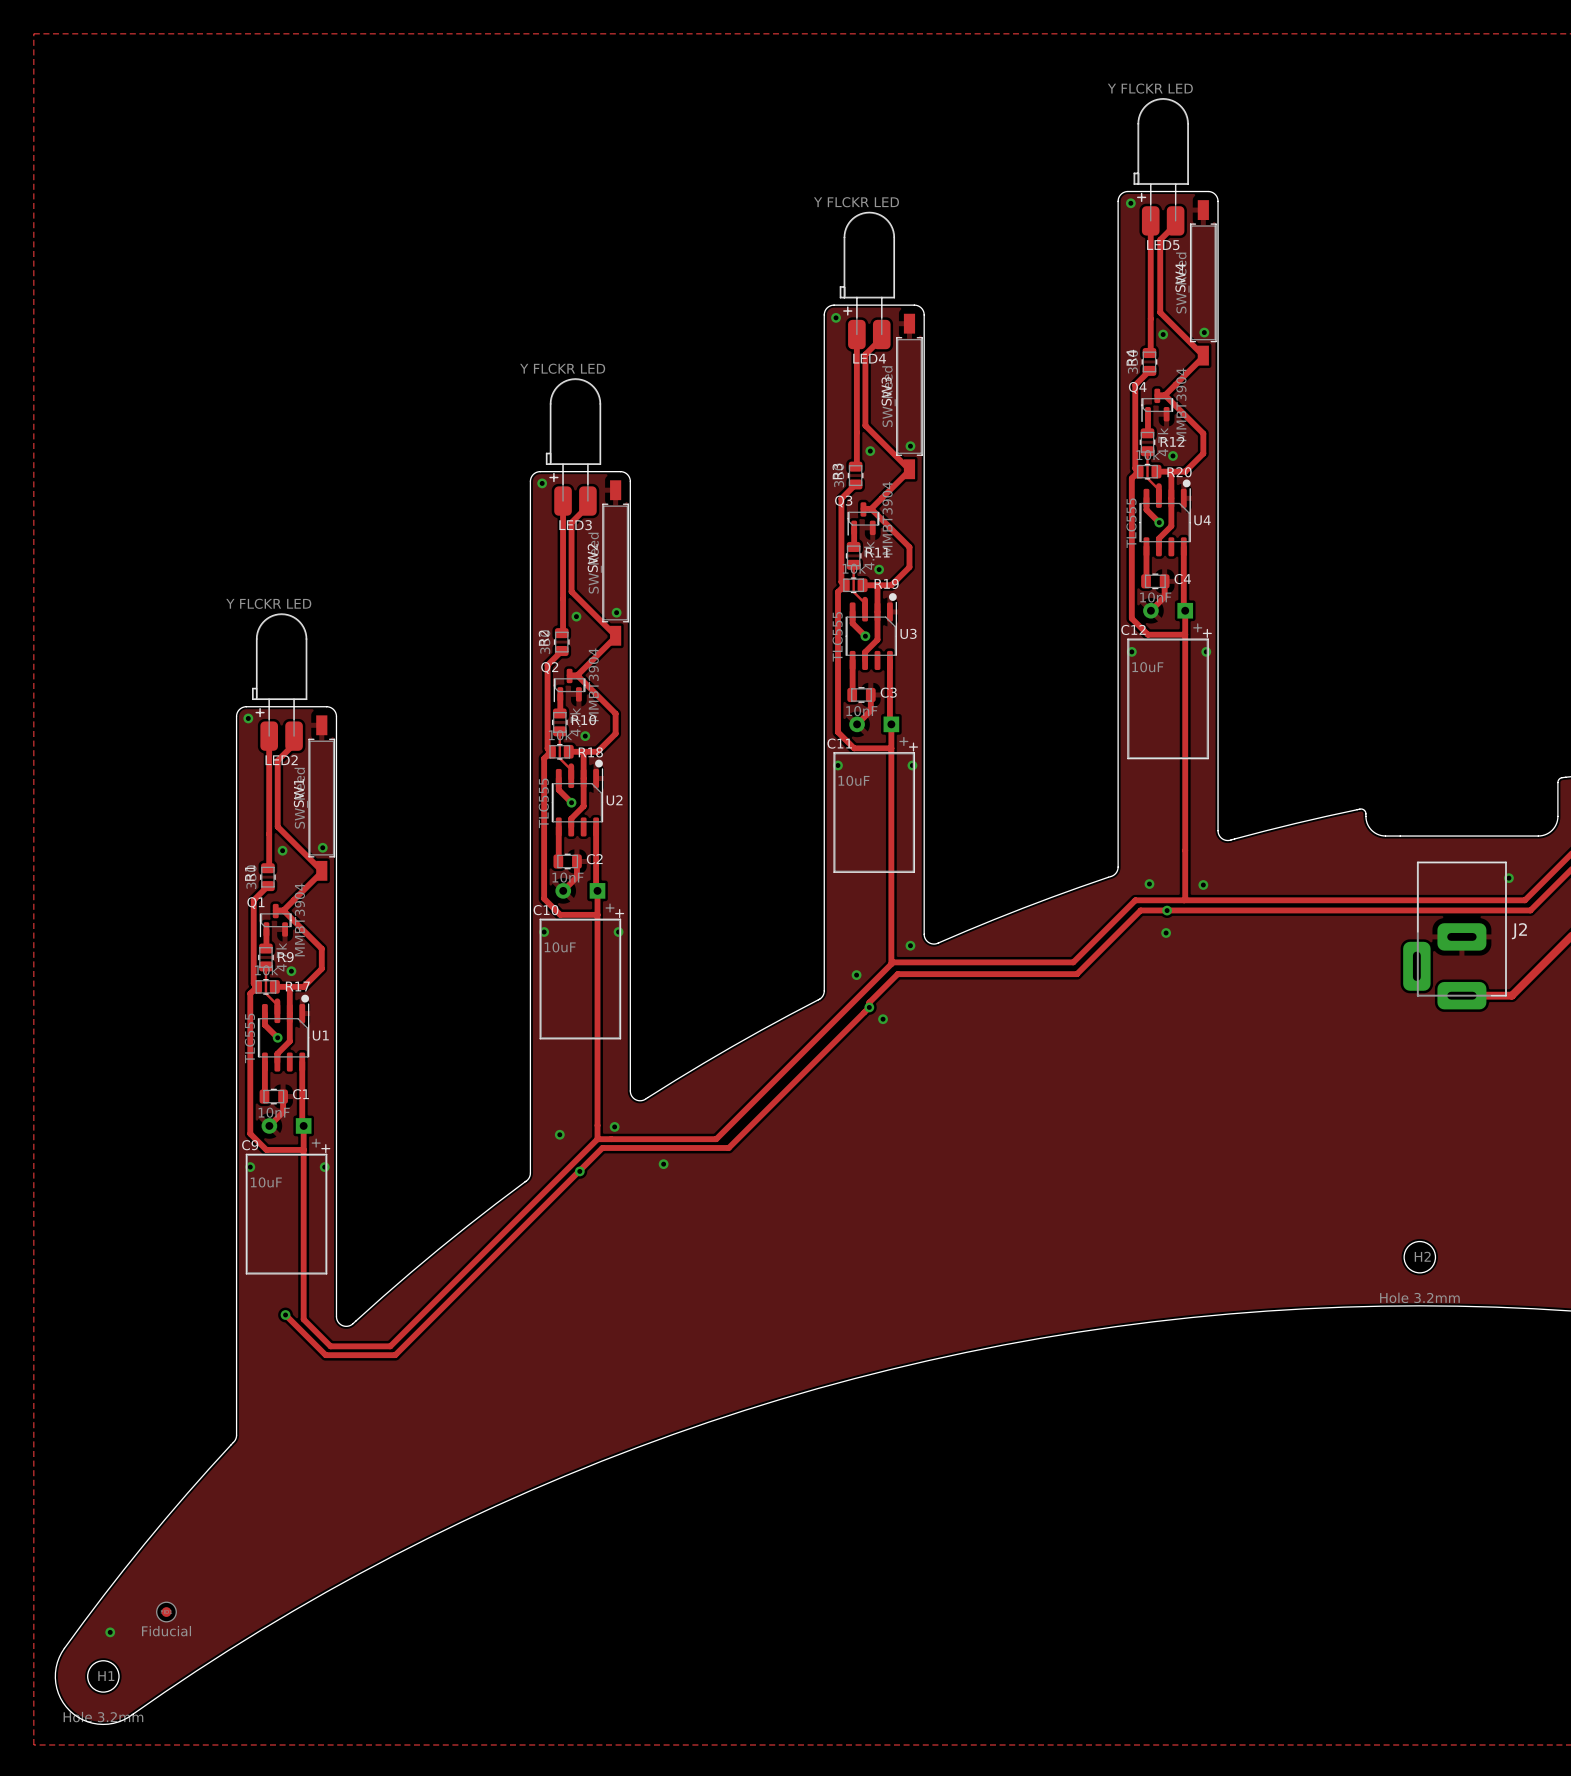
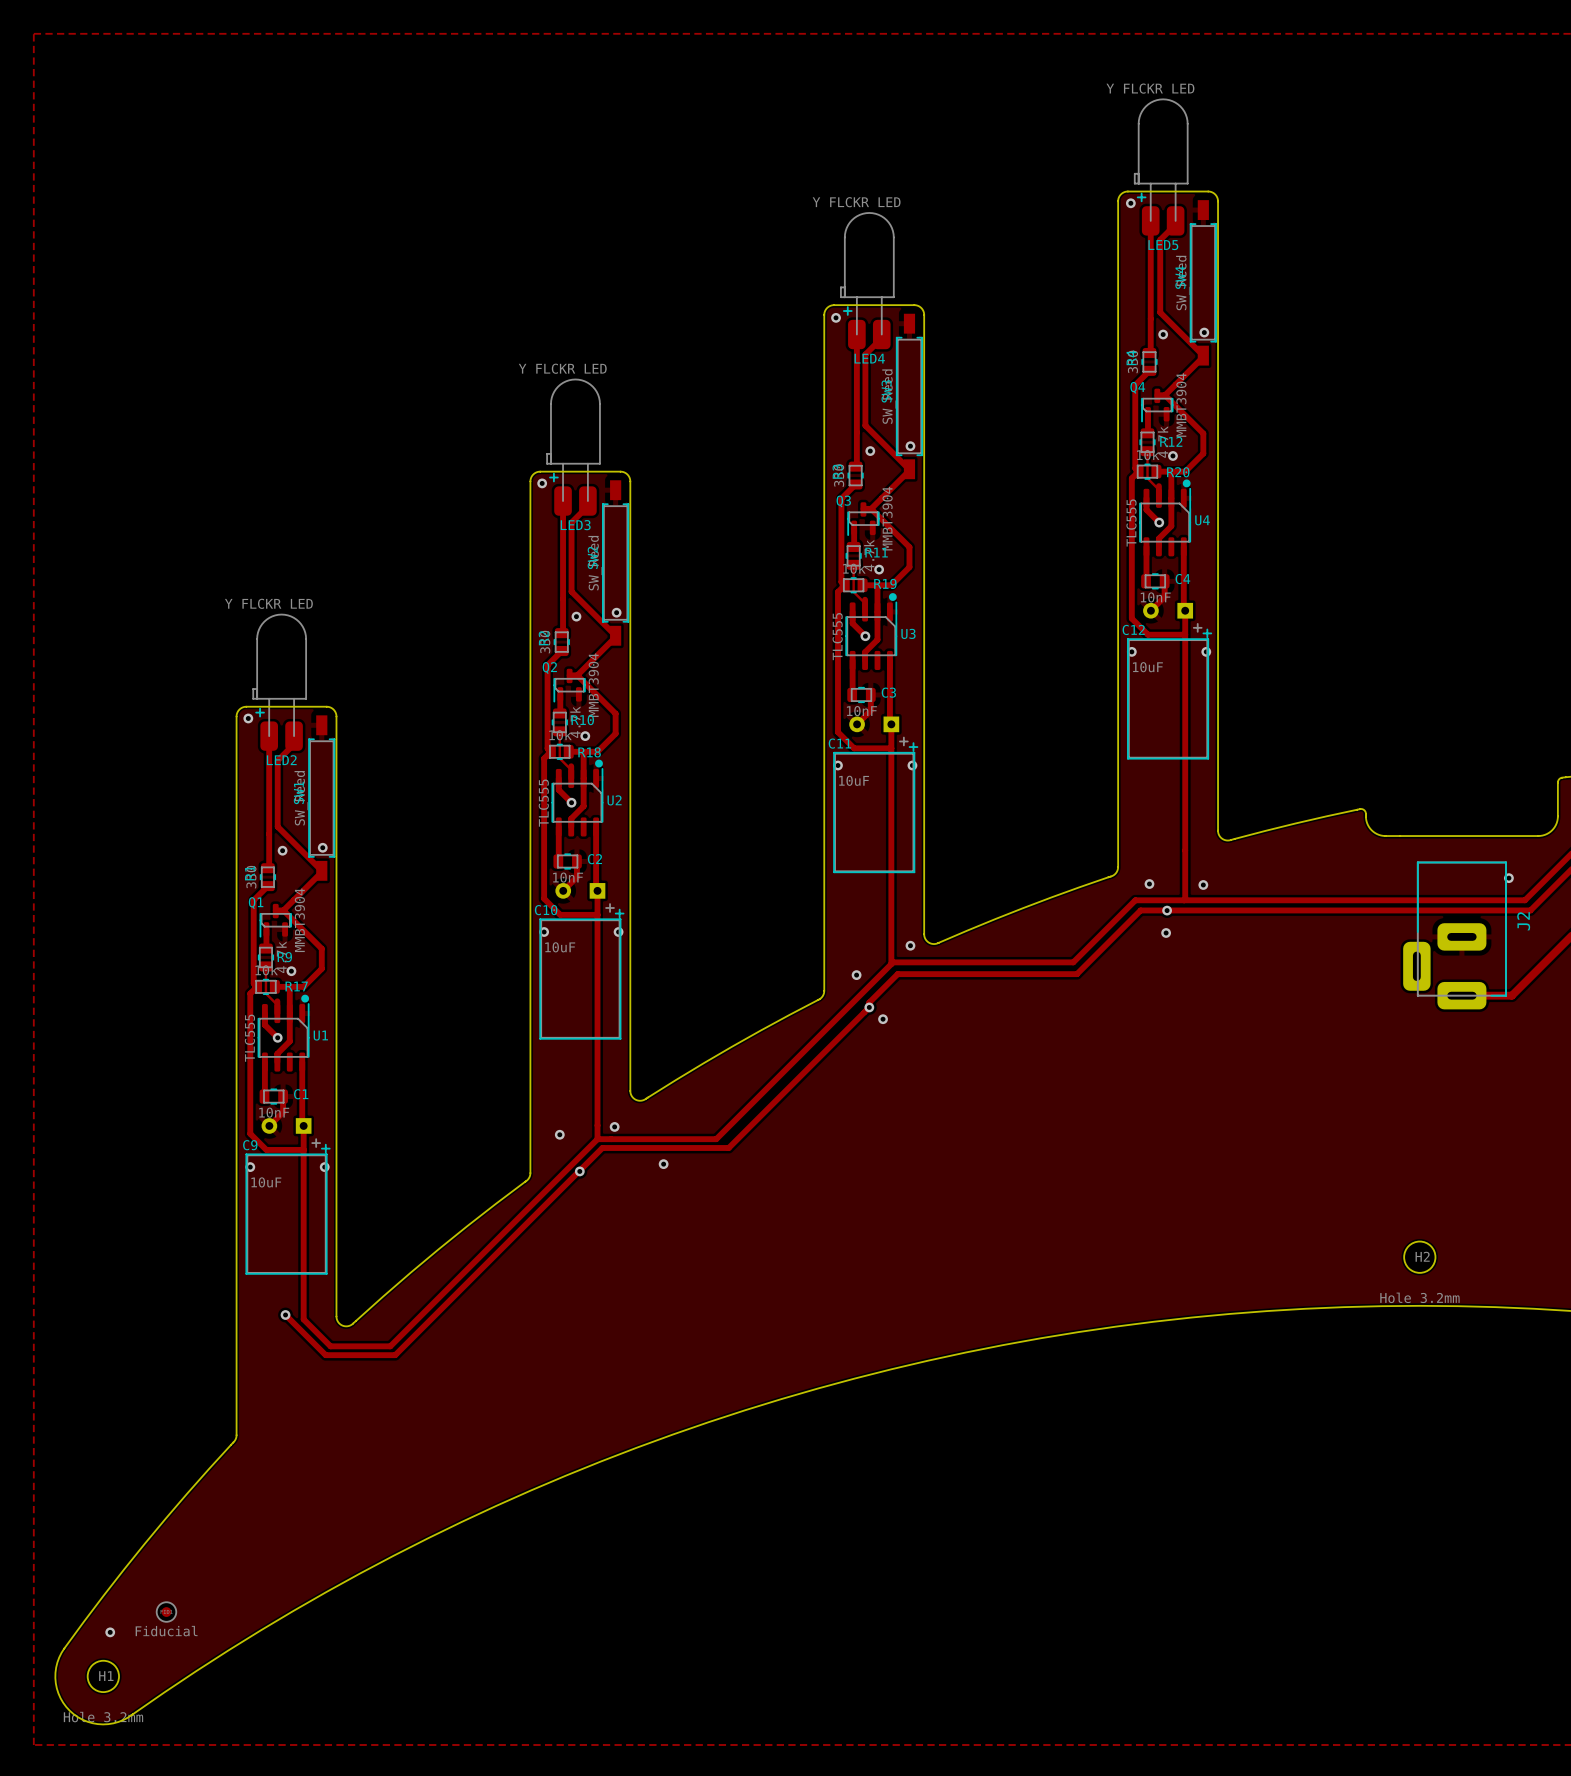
LED5 footprint: [1133, 98, 1189, 236] -> [1134, 98, 1189, 236]
LED4 footprint: [839, 211, 895, 350] -> [840, 212, 895, 350]
LED3 footprint: [545, 378, 602, 516] -> [546, 378, 601, 516]
LED2 footprint: [252, 613, 308, 751] -> [252, 614, 307, 751]
J2 name rotation: 0° (1519, 931) -> 90° counterclockwise (1523, 921)

